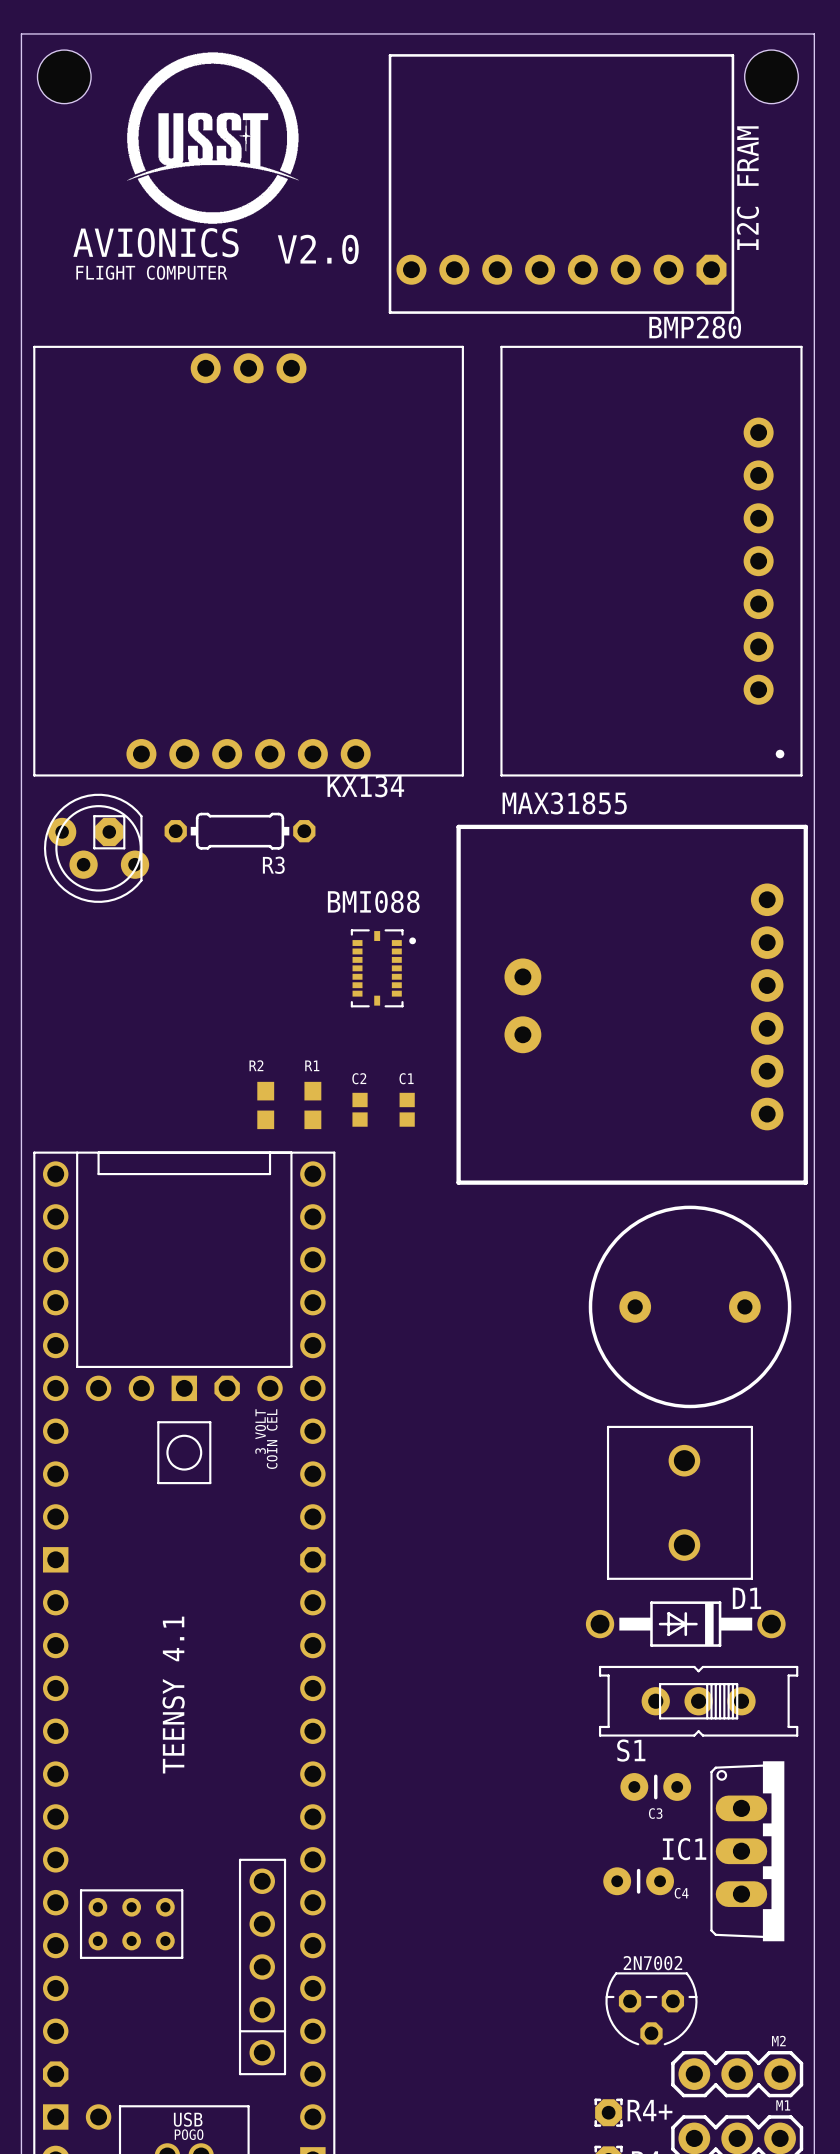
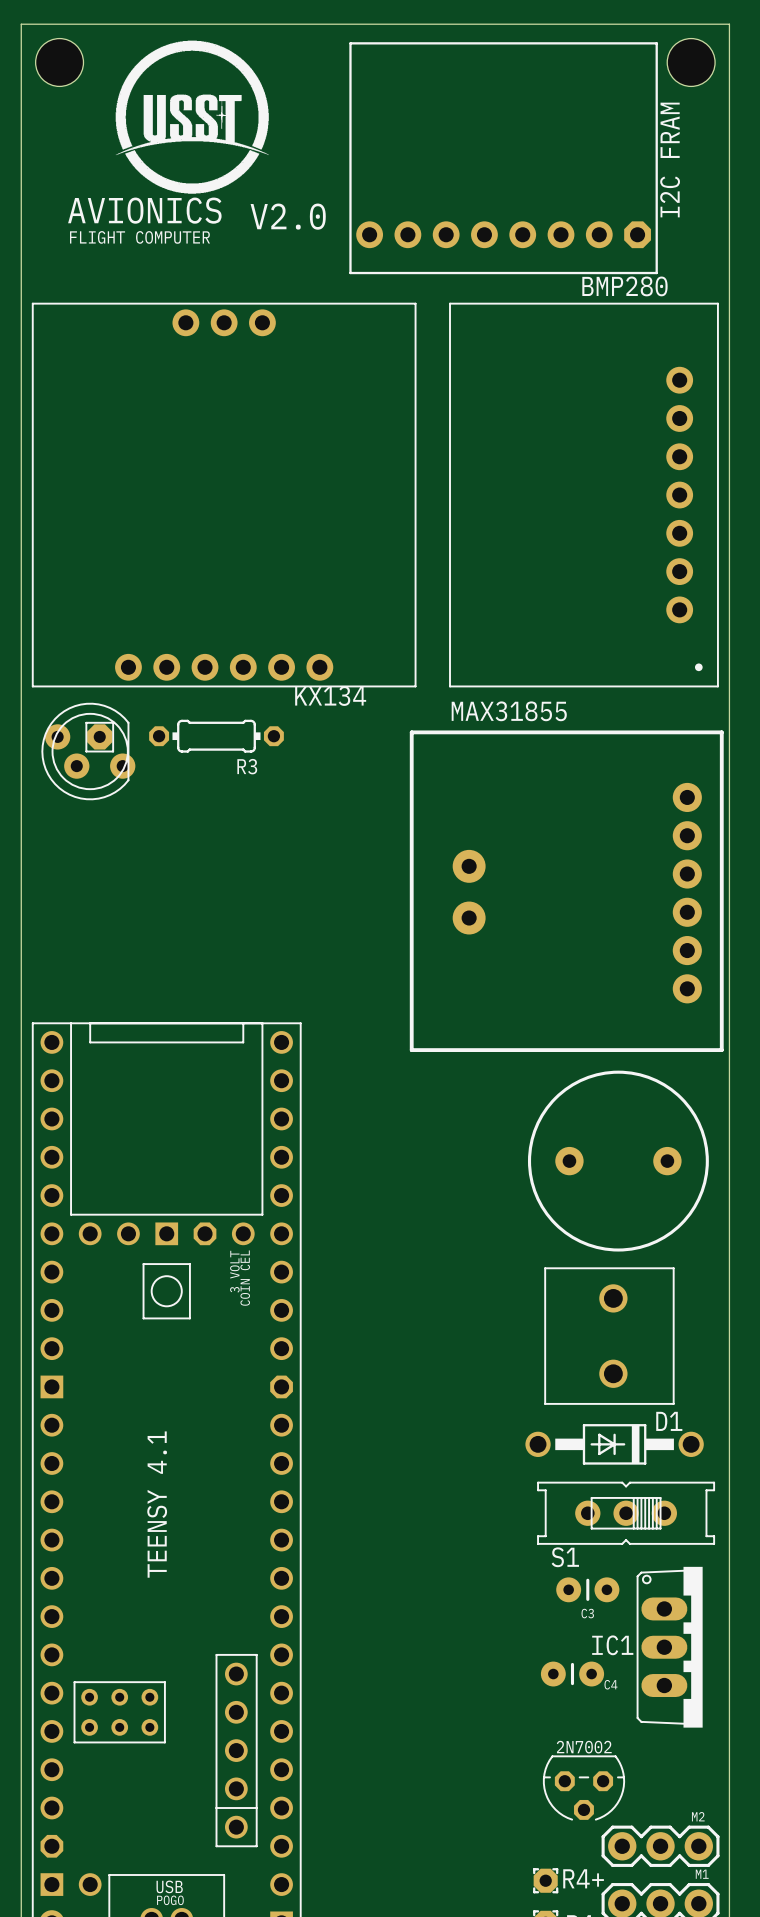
text: BMI088 (373, 901) -> none
part: (383, 968) -> none
text: R2 (256, 1065) -> none
text: R1 (312, 1065) -> none
text: C2 (359, 1078) -> none
text: C1 (406, 1078) -> none
part: (265, 1105) -> none
part: (312, 1105) -> none
part: (360, 1109) -> none
part: (407, 1109) -> none

